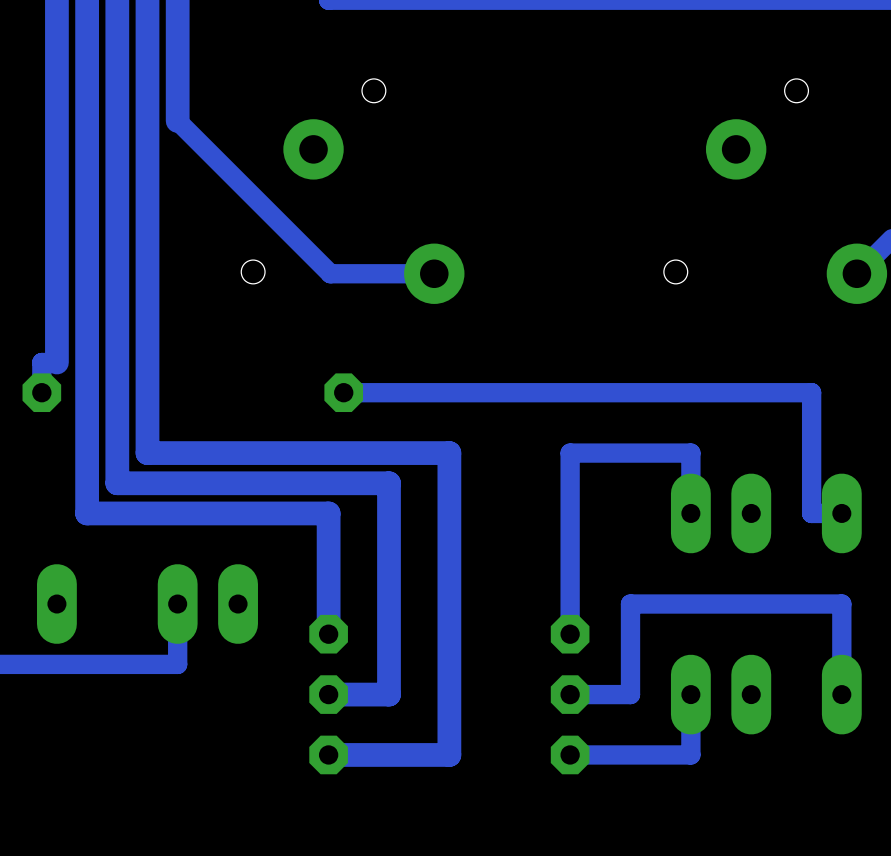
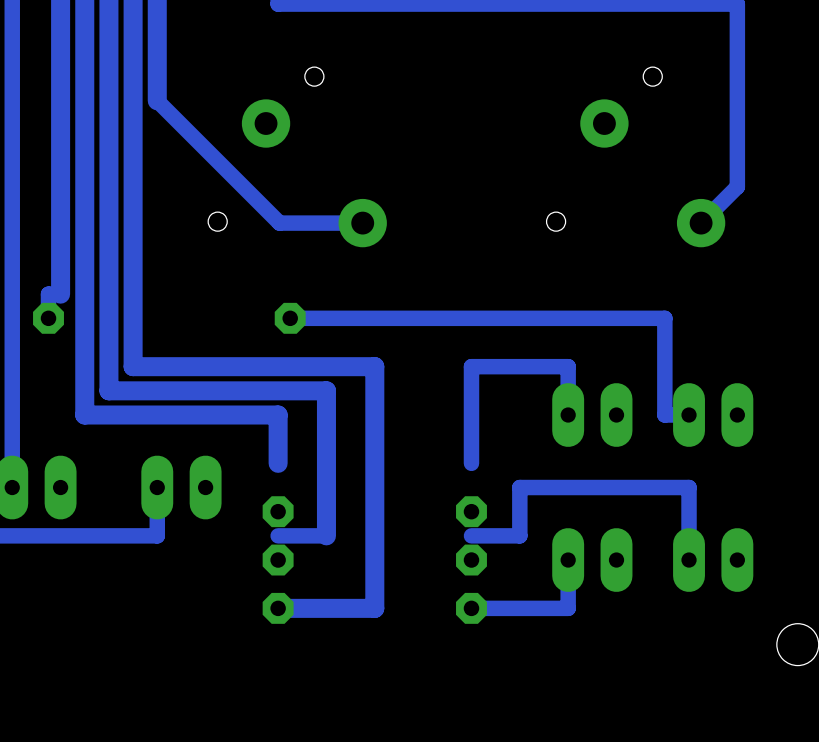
track: (328, 573) (328, 634) -> none
track: (570, 573) (570, 634) -> none
track: (389, 664) (389, 694) (328, 694) -> (326, 535) (278, 535)
track: (630, 664) (630, 694) (570, 694) -> (519, 535) (471, 535)

